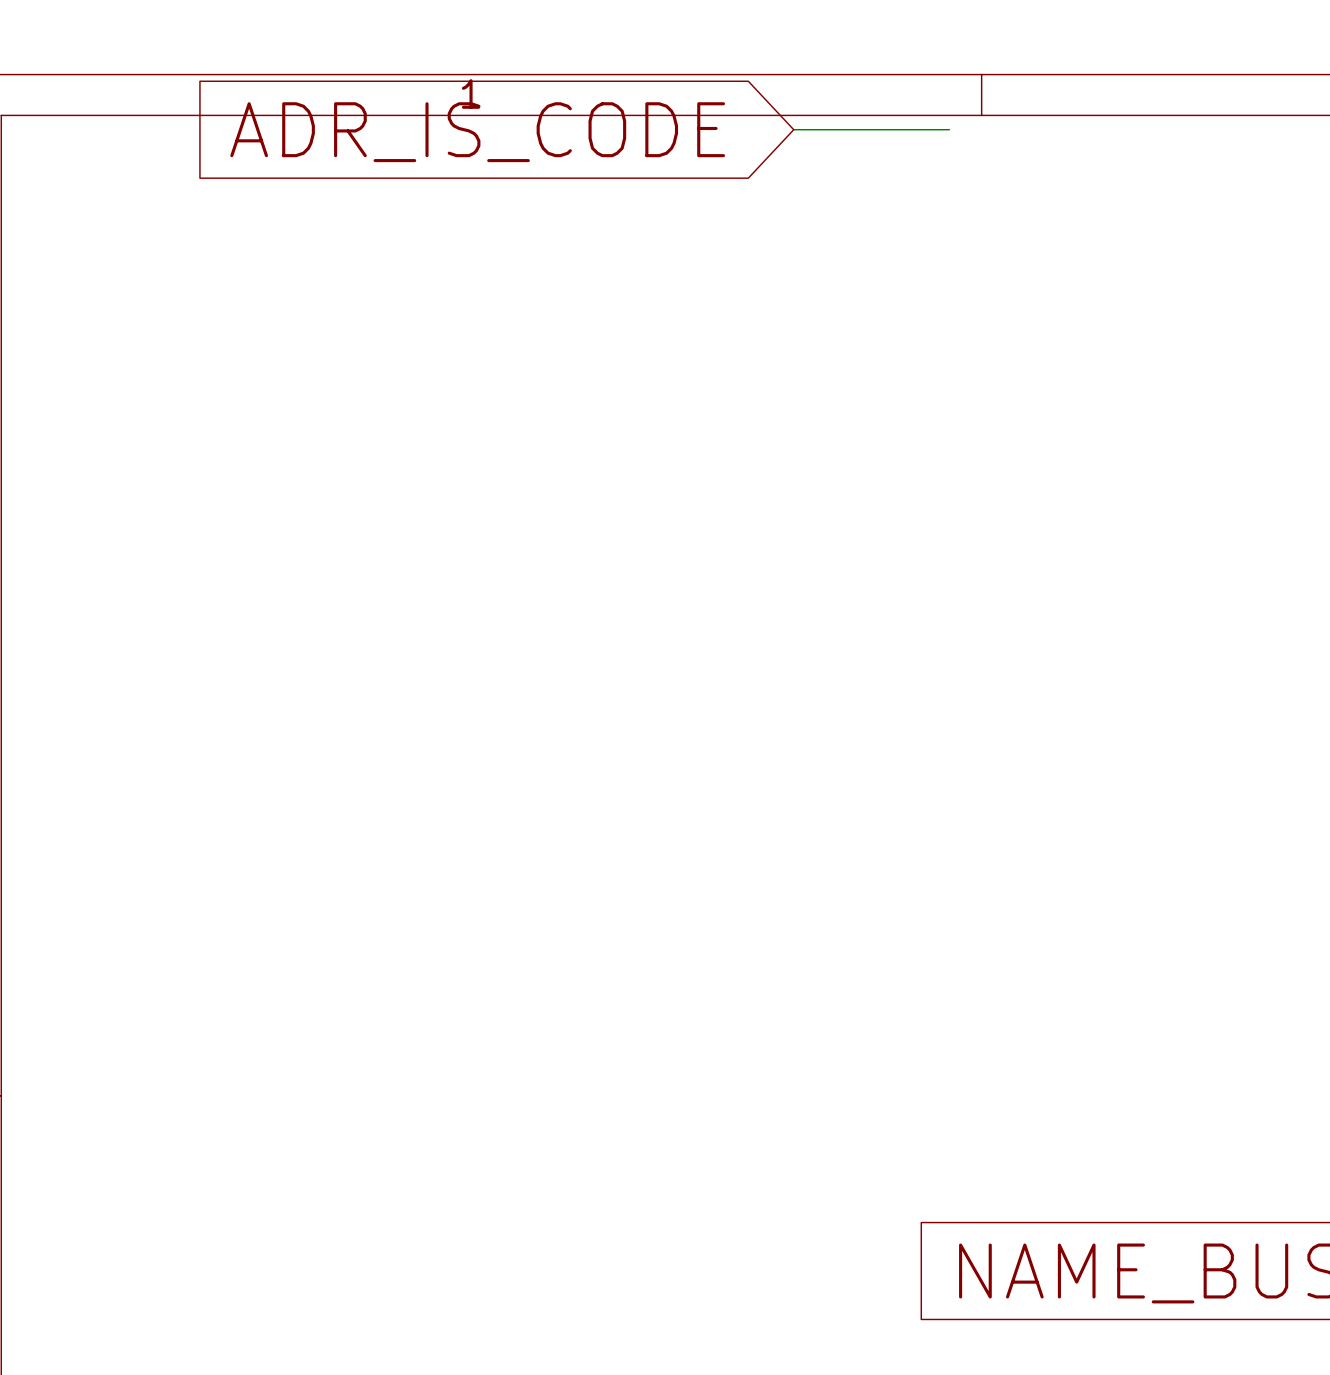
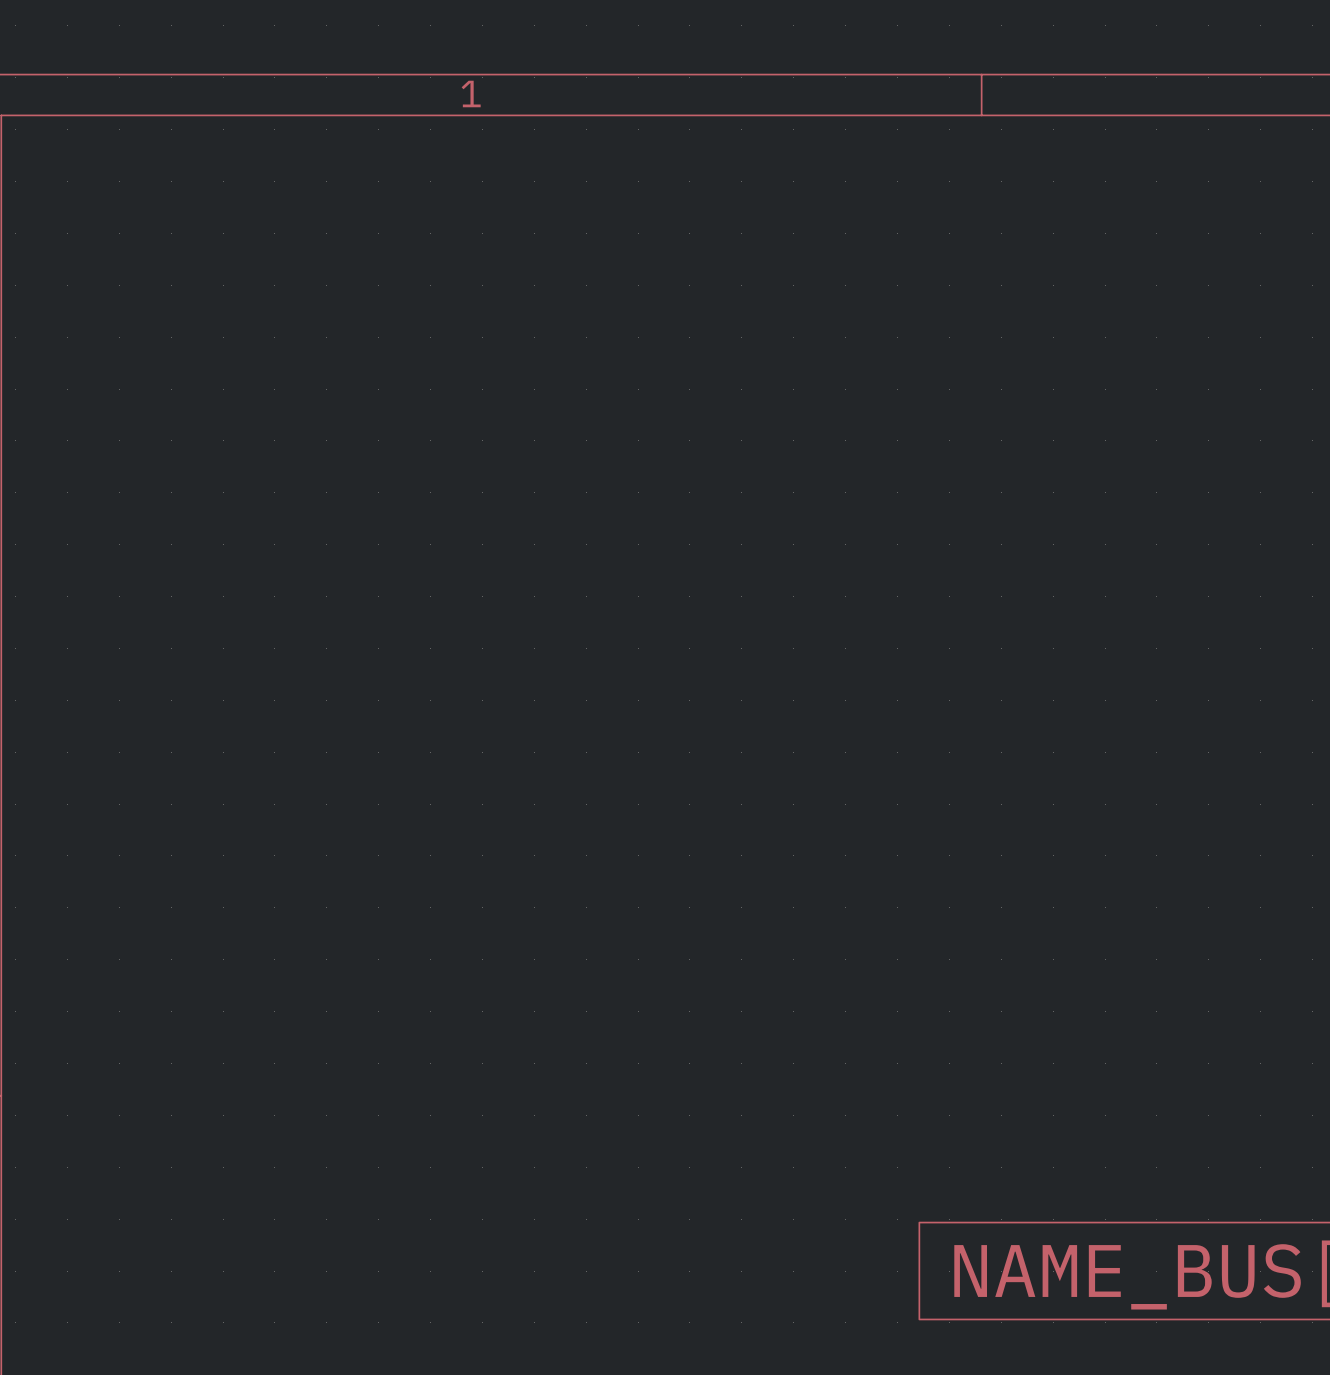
wire: (793, 129) (949, 129) -> none
global label: ADR_IS_CODE (477, 132) -> none

